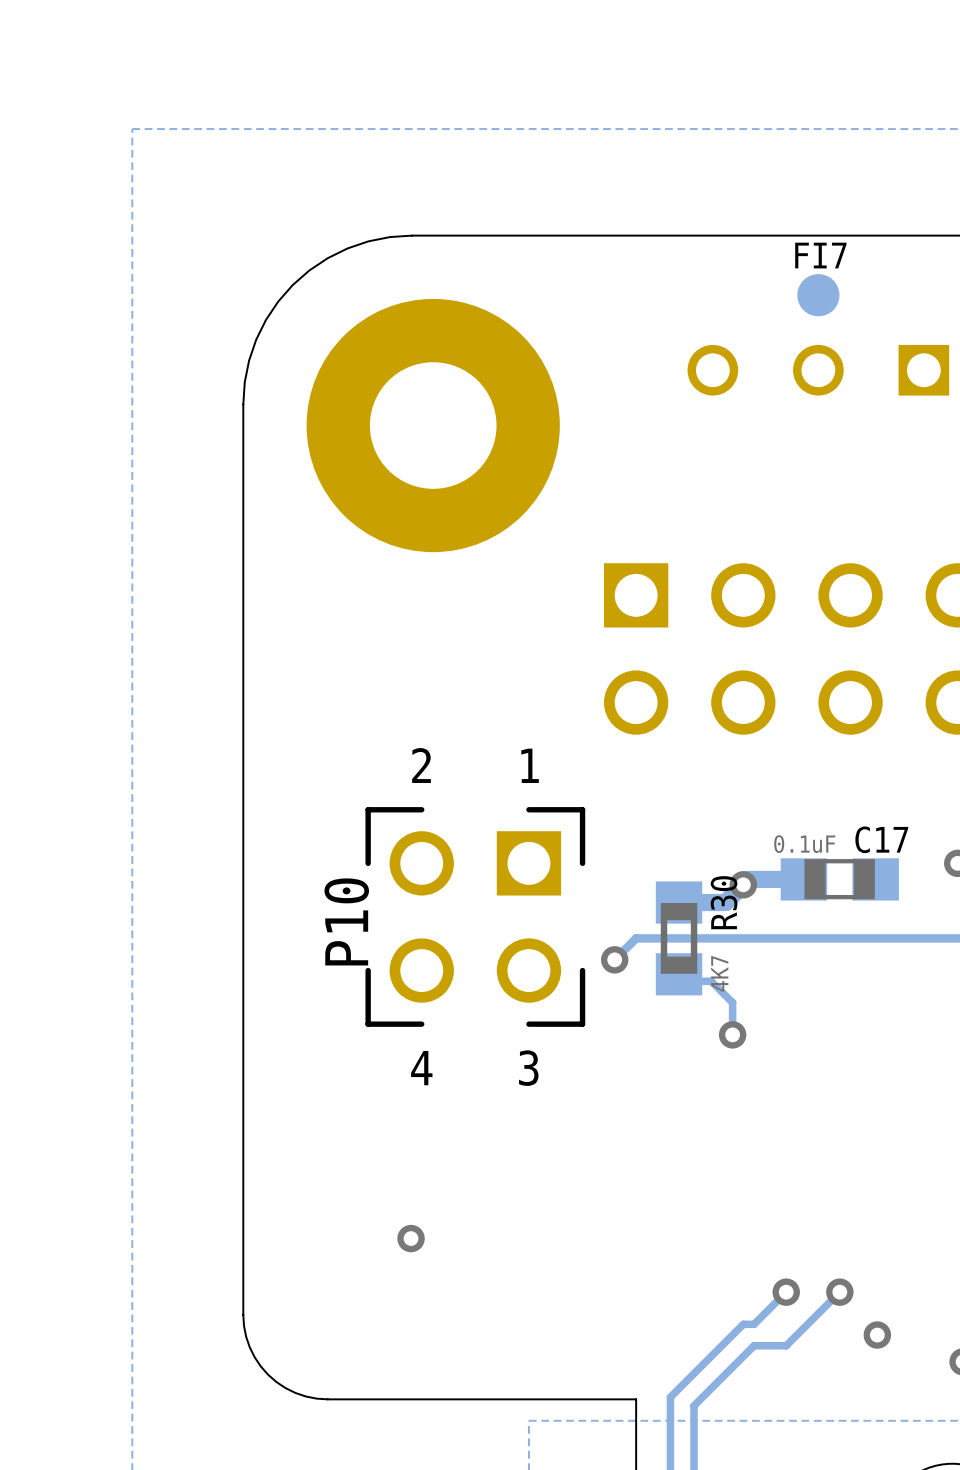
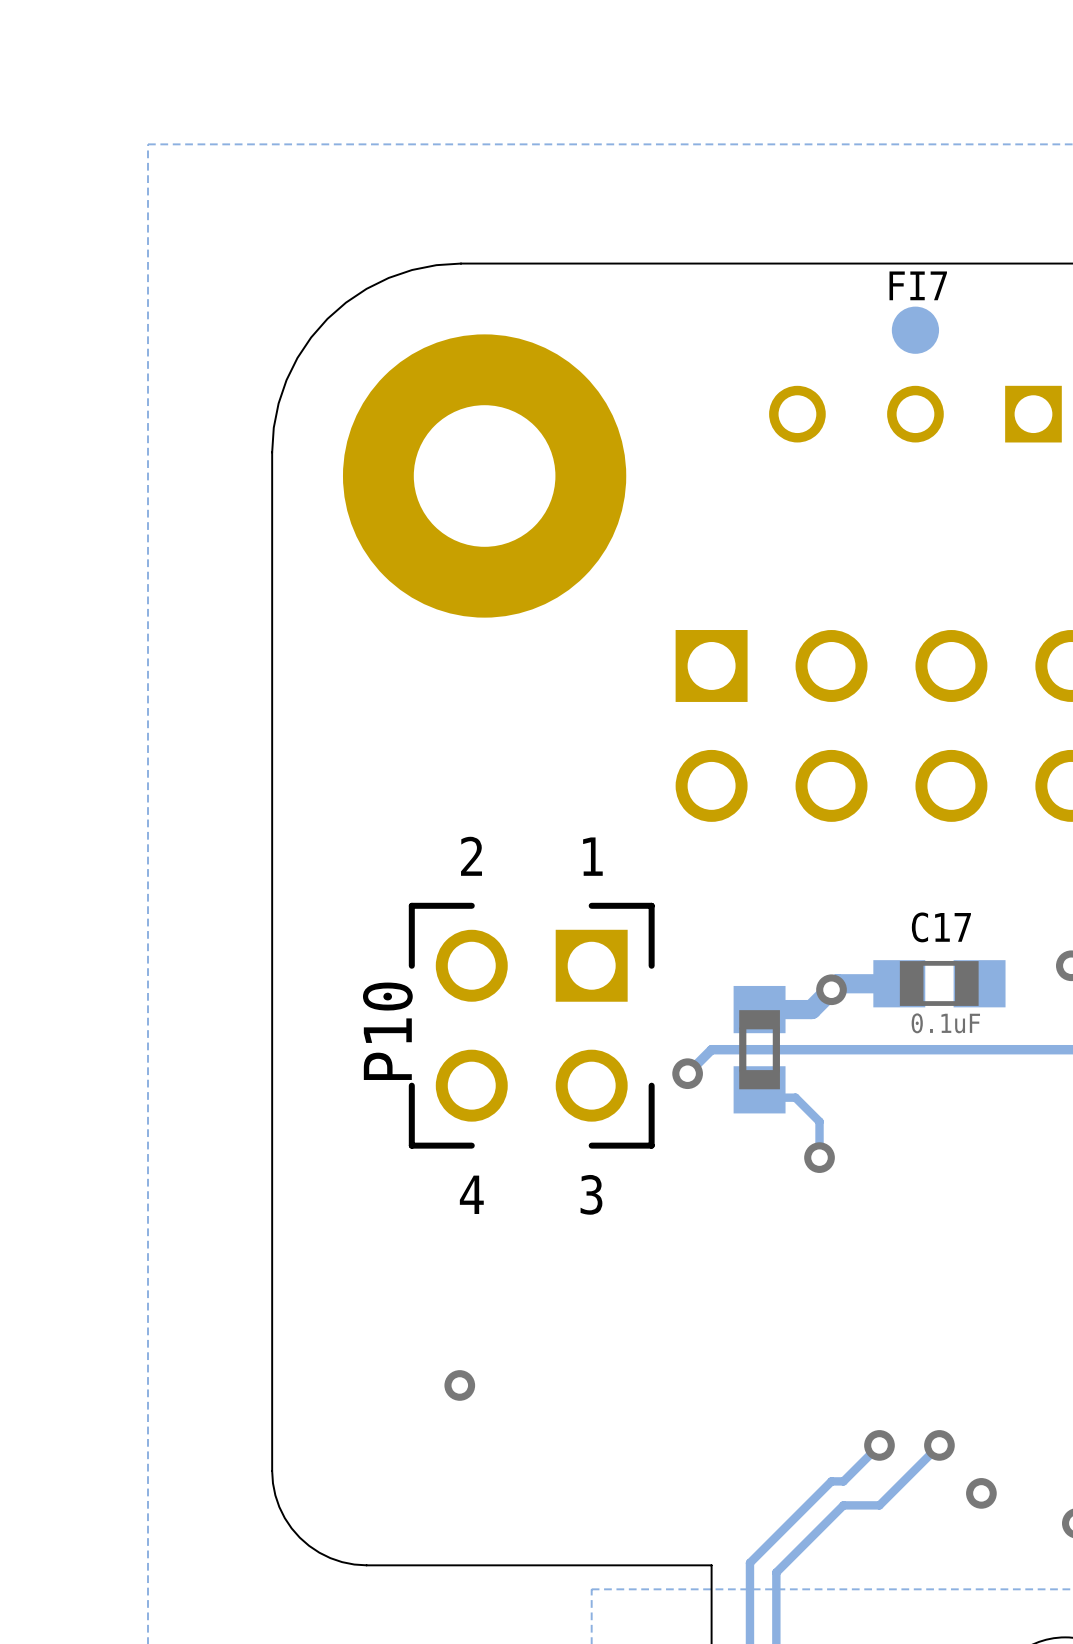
C17 name position: C17 (881, 839) -> C17 (941, 927)
C17 value position: 0.1uF (804, 844) -> 0.1uF (945, 1023)
R30 name: R30 (724, 902) -> none
R30 value: 4K7 (719, 973) -> none

